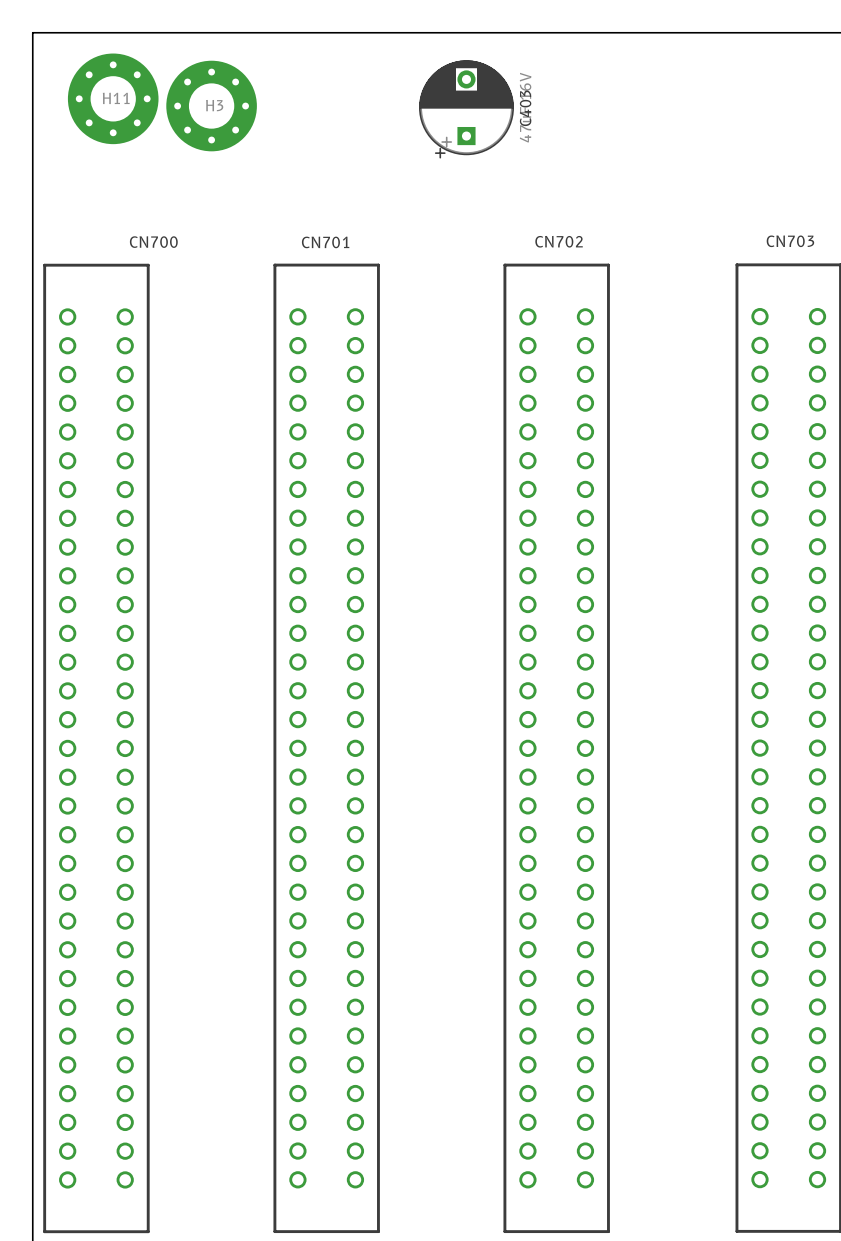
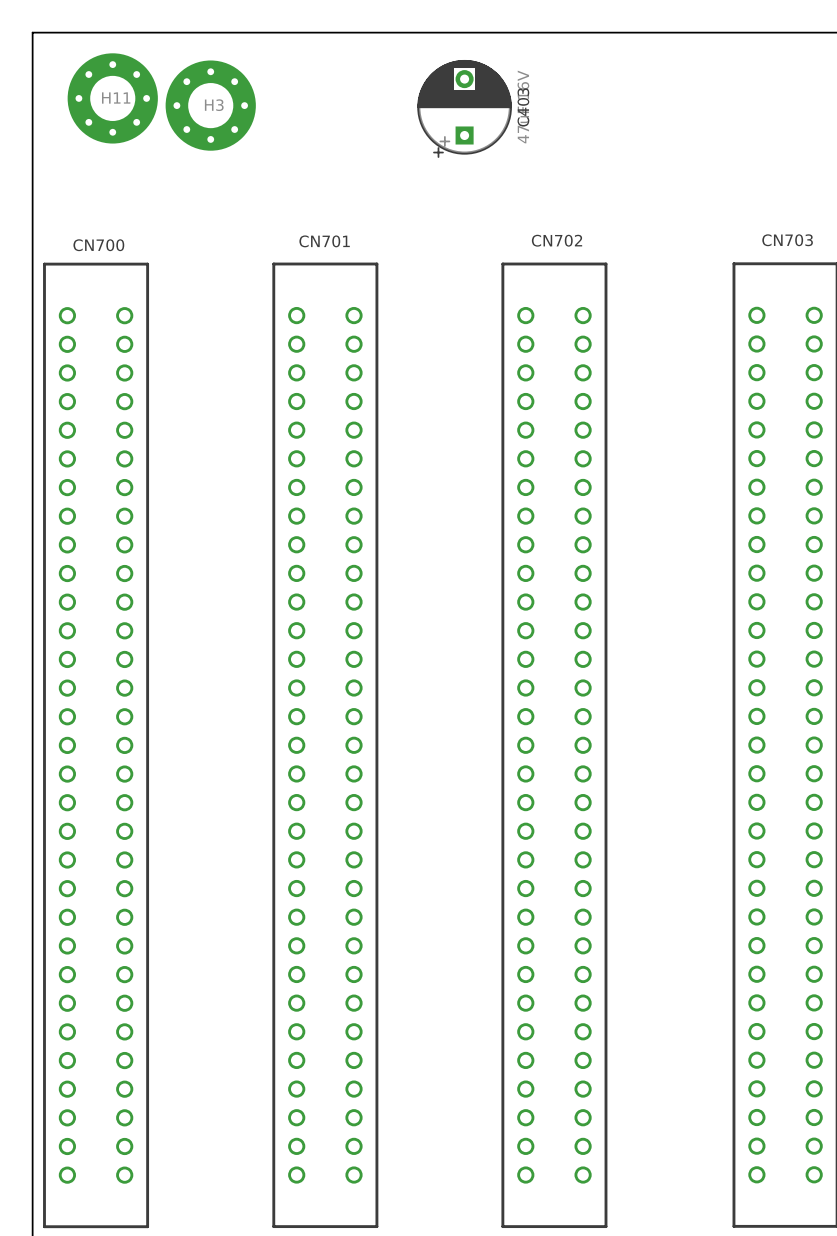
CN700 name position: CN700 (153, 242) -> CN700 (98, 245)

